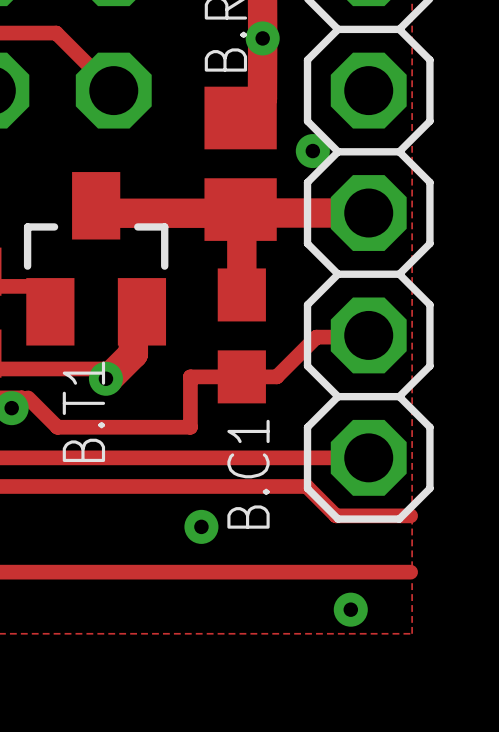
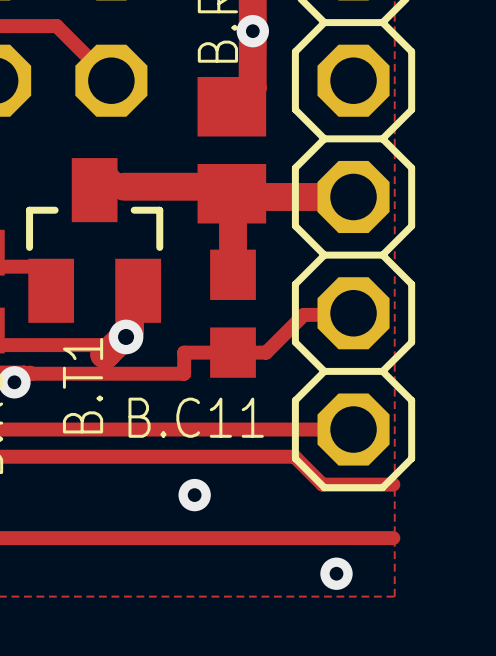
via: (312, 151) -> none
track: (96, 205) (103, 213) (236, 213) (240, 209) -> (112, 174) (123, 186) (226, 186) (233, 194)
via position: (105, 378) -> (126, 336)
track: (29, 399) (57, 427) (190, 427) (190, 399) -> (31, 373) (184, 373)
B.C1 name: B.C1 (248, 474) -> B.C11 (196, 417)

